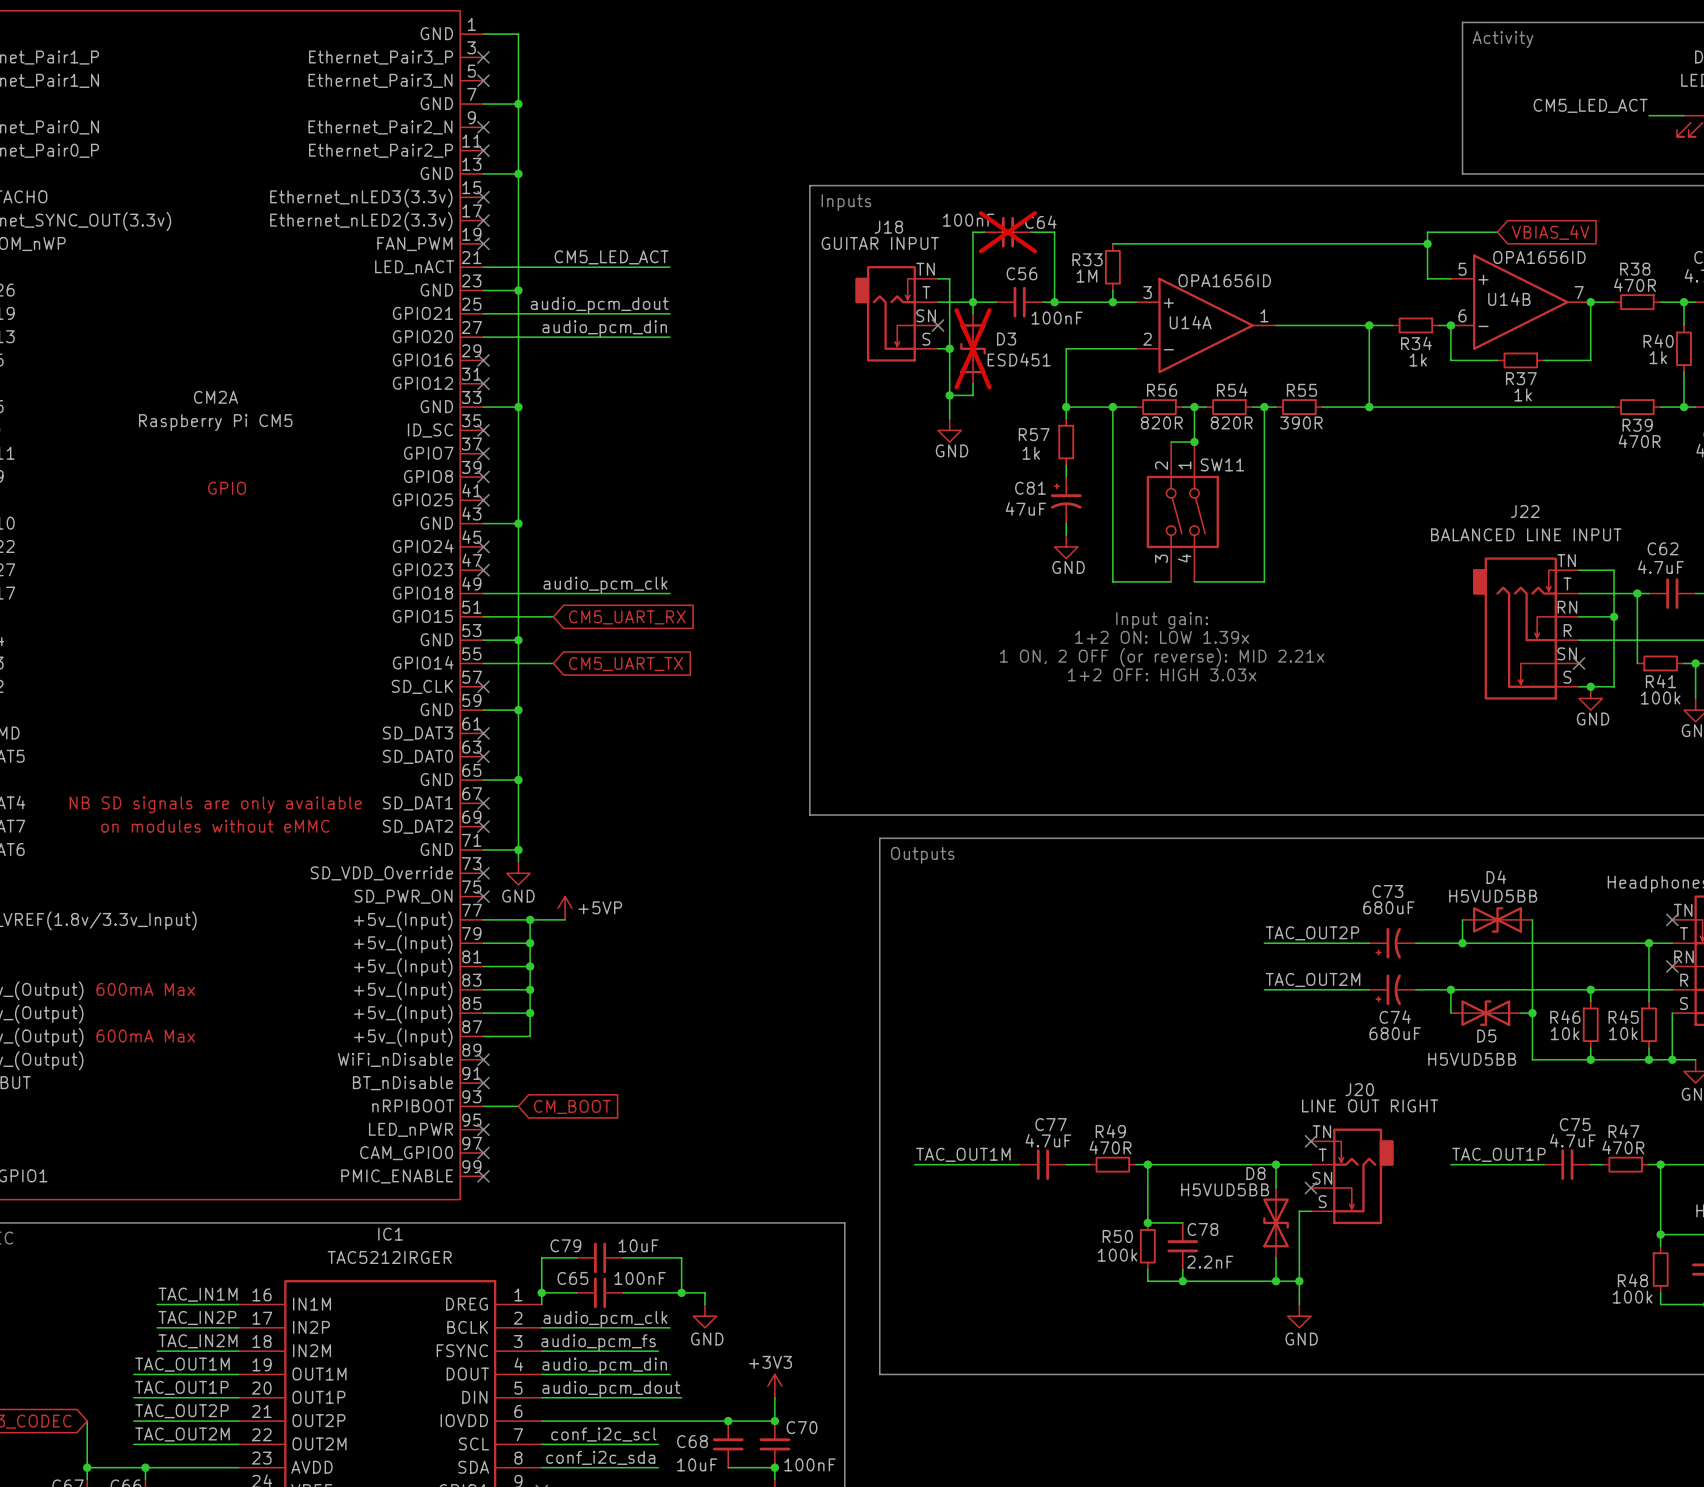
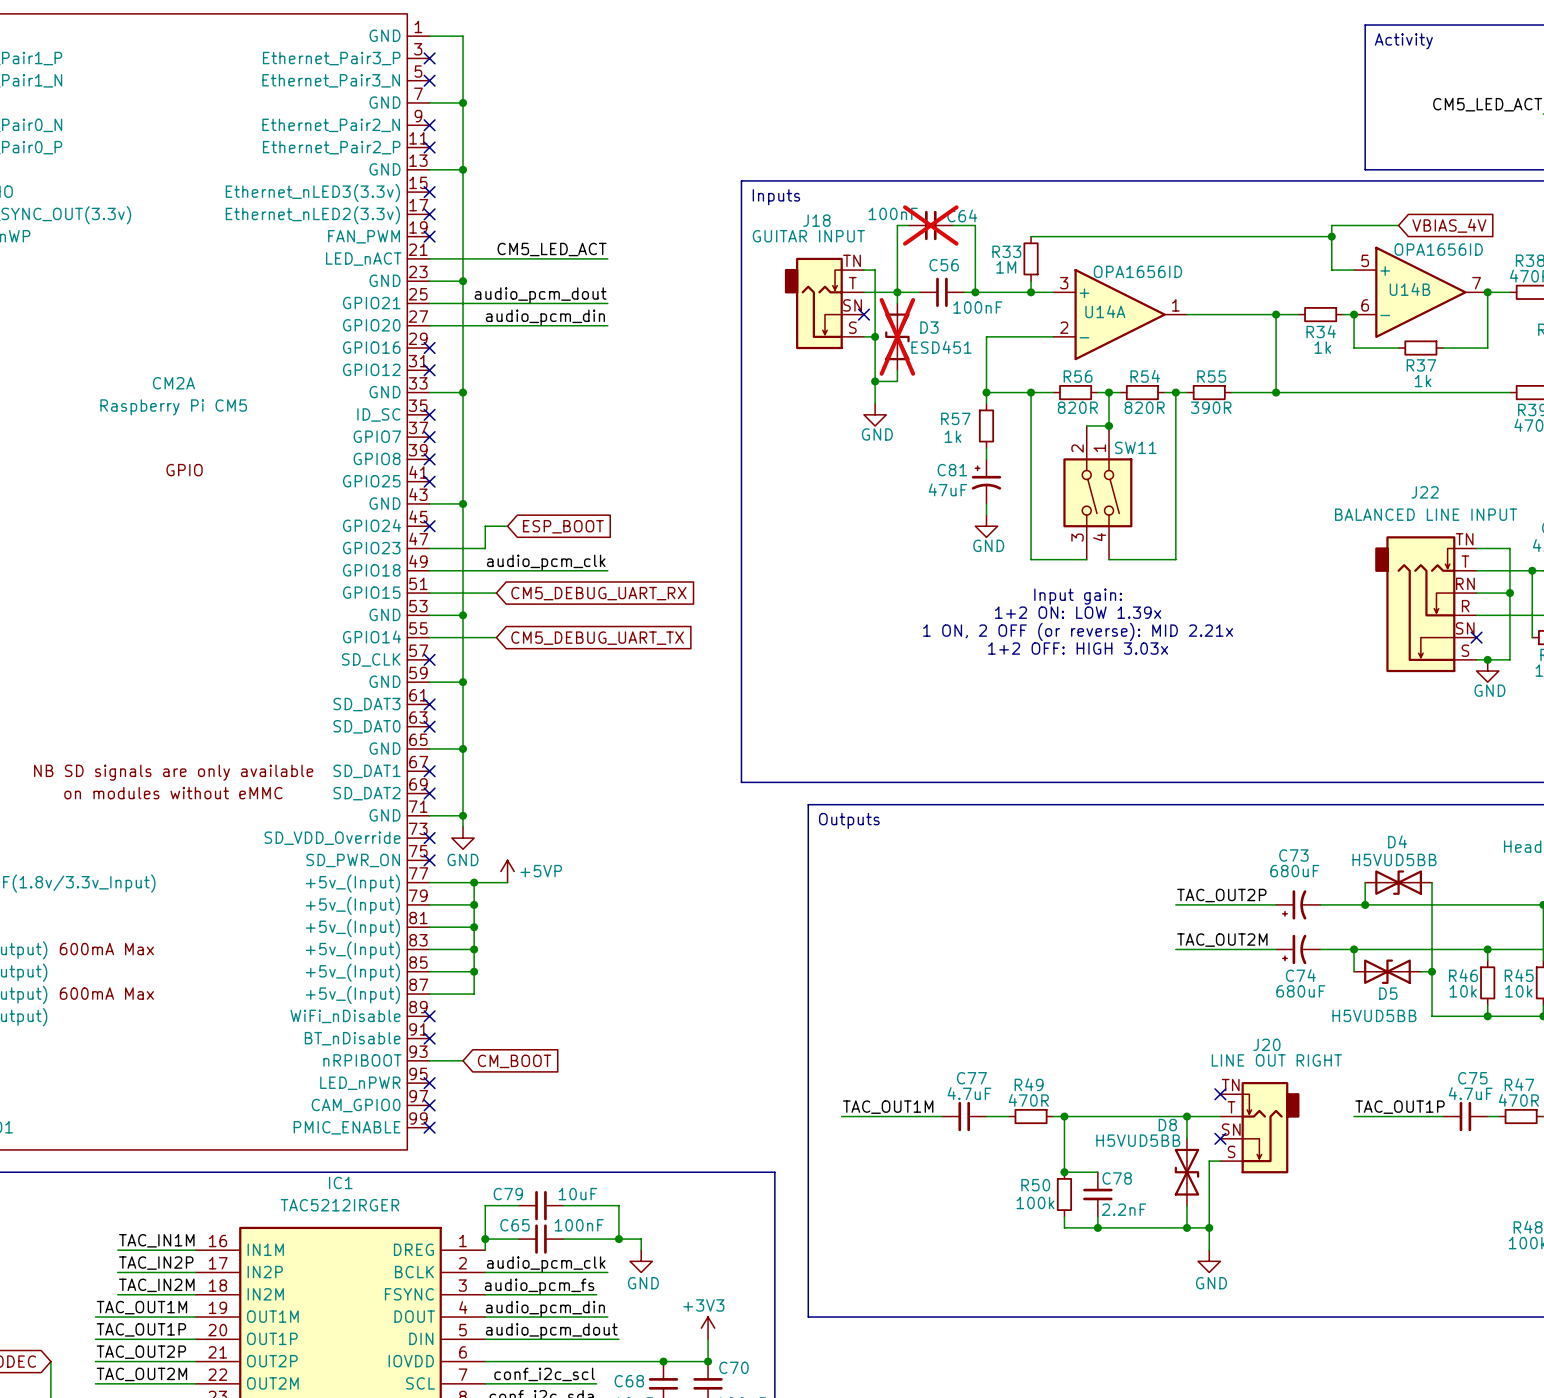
wire: none -> (507, 526) (485, 526) (485, 548) (429, 548)
global label: none -> ESP_BOOT (563, 526)
no-connect mark: (483, 570) -> none
global label: CM5_UART_RX (627, 617) -> CM5_DEBUG_UART_RX (598, 593)
global label: CM5_UART_TX (626, 664) -> CM5_DEBUG_UART_TX (597, 638)

